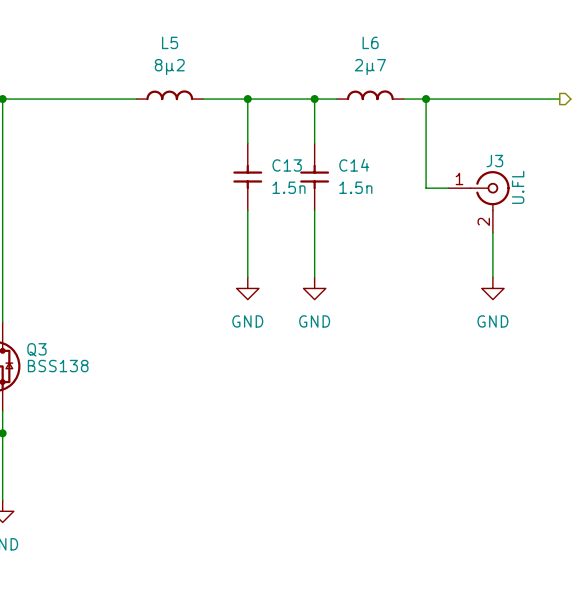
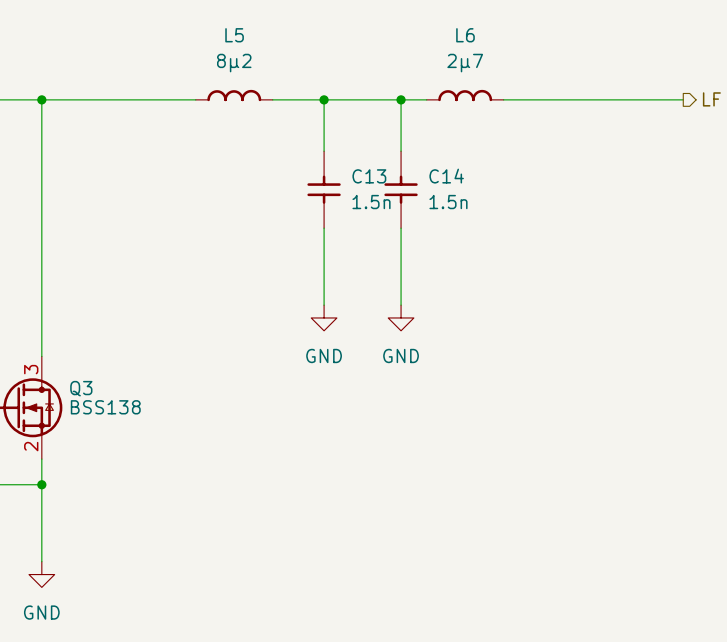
wire: (426, 99) (426, 188) (448, 188) -> none
junction: (426, 99) -> none
J3: U.FL (478, 201) -> none
wire: (492, 232) (492, 277) -> none
power symbol: GND (492, 288) -> none

